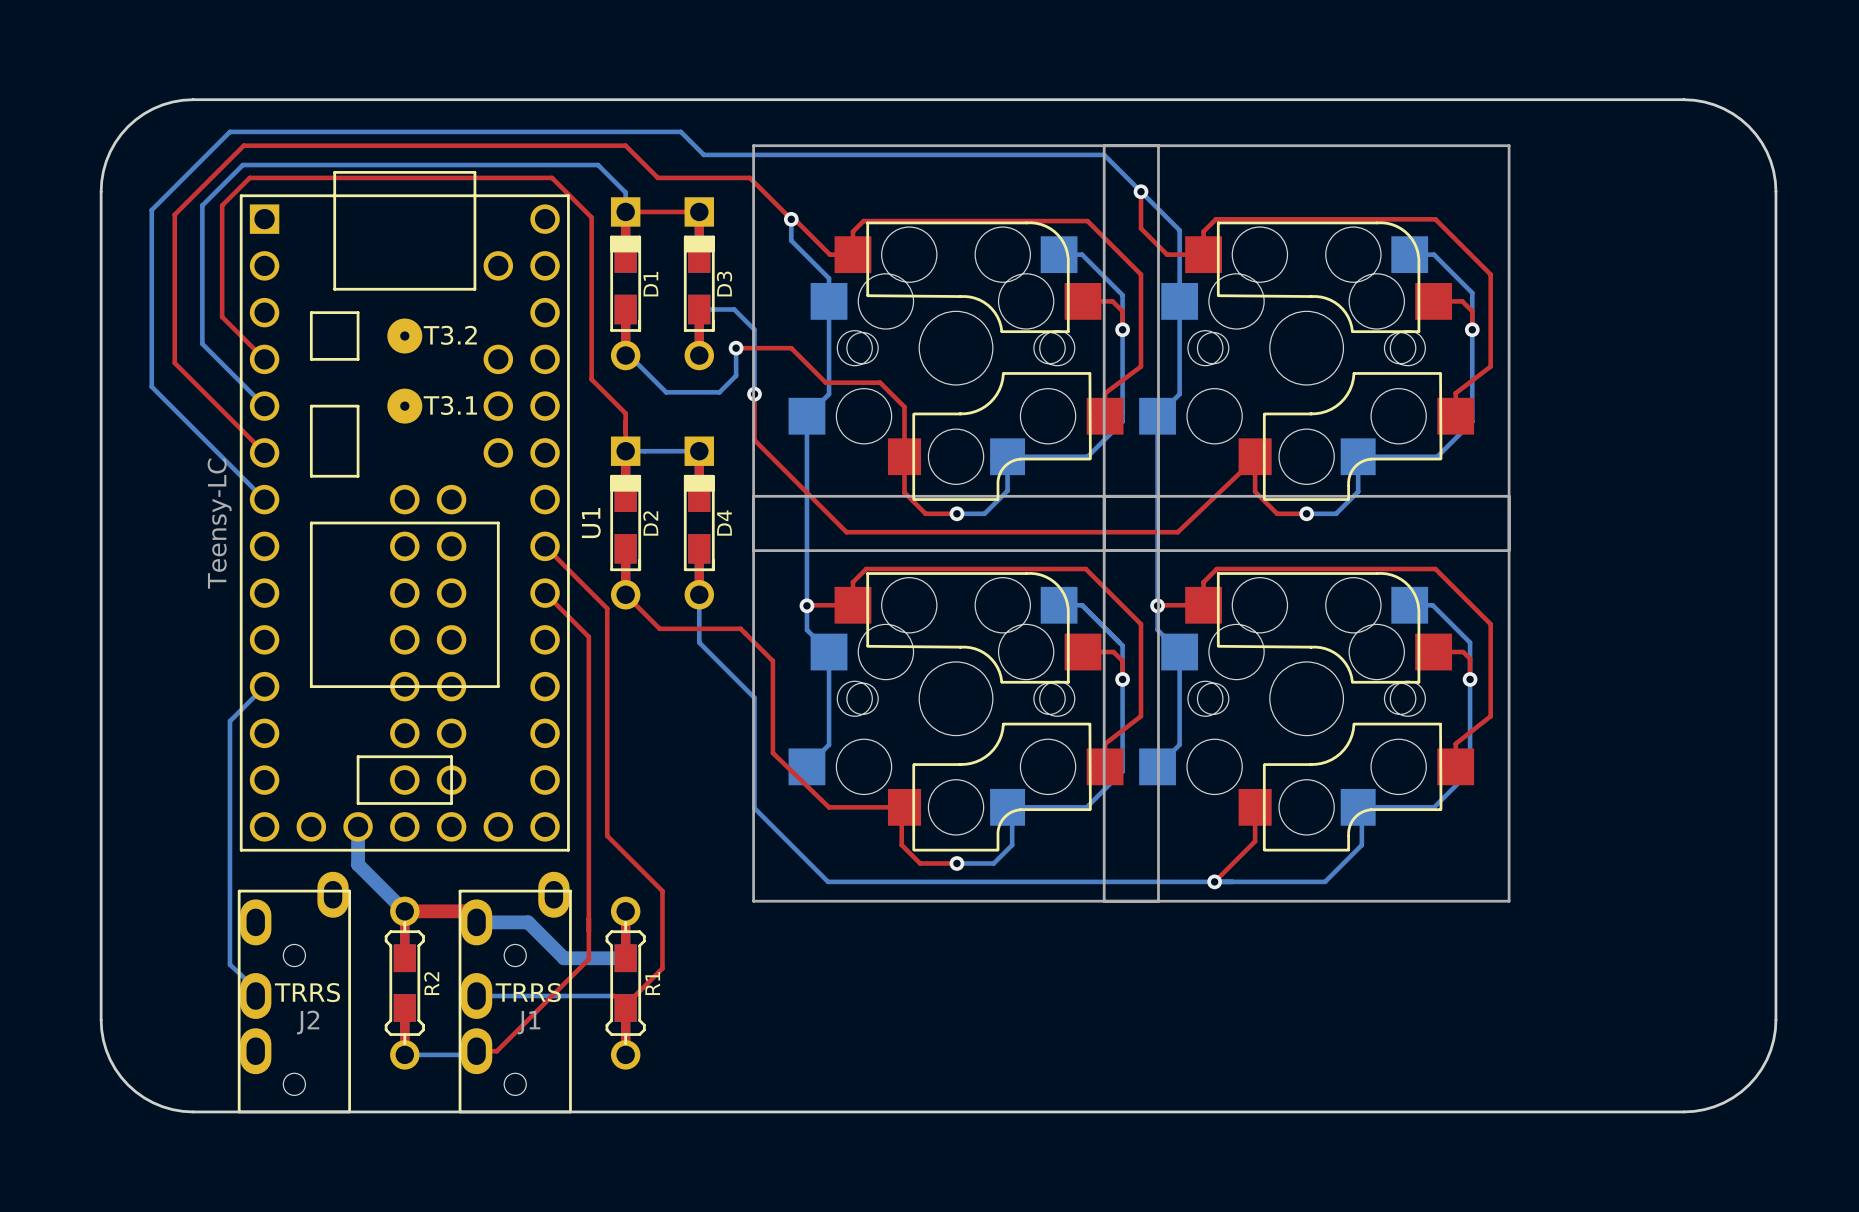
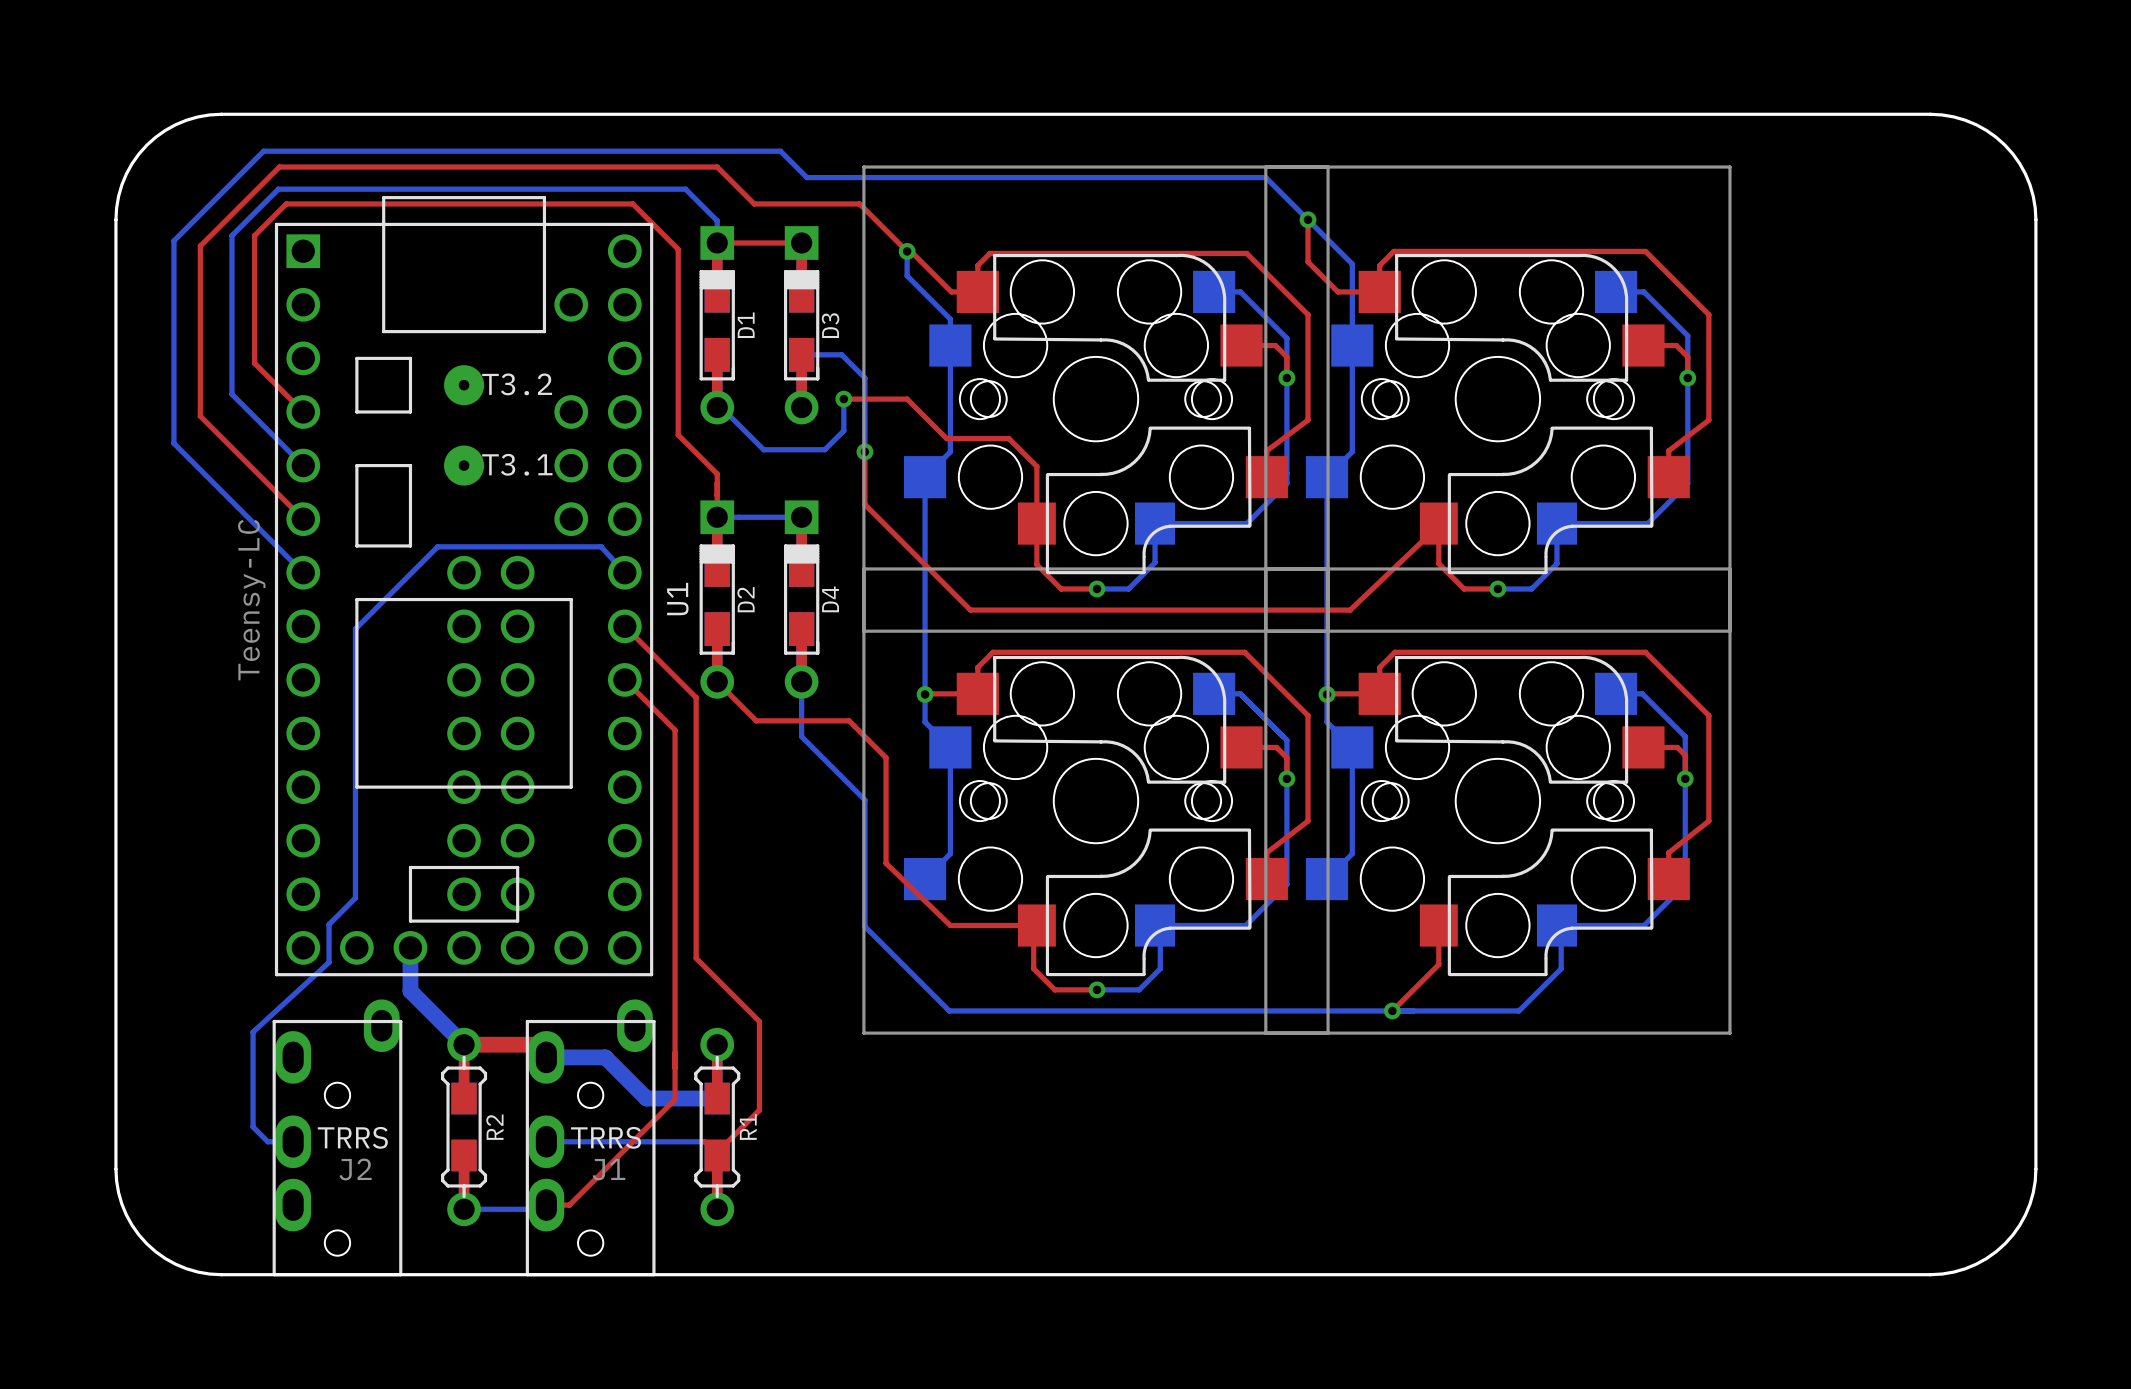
bottom track: (264, 686) (229, 721) (229, 964) (255, 988) (255, 995) -> (624, 572) (601, 546) (437, 546) (355, 629) (355, 898) (329, 924) (329, 962) (253, 1032) (253, 1127) (267, 1141) (293, 1141)

